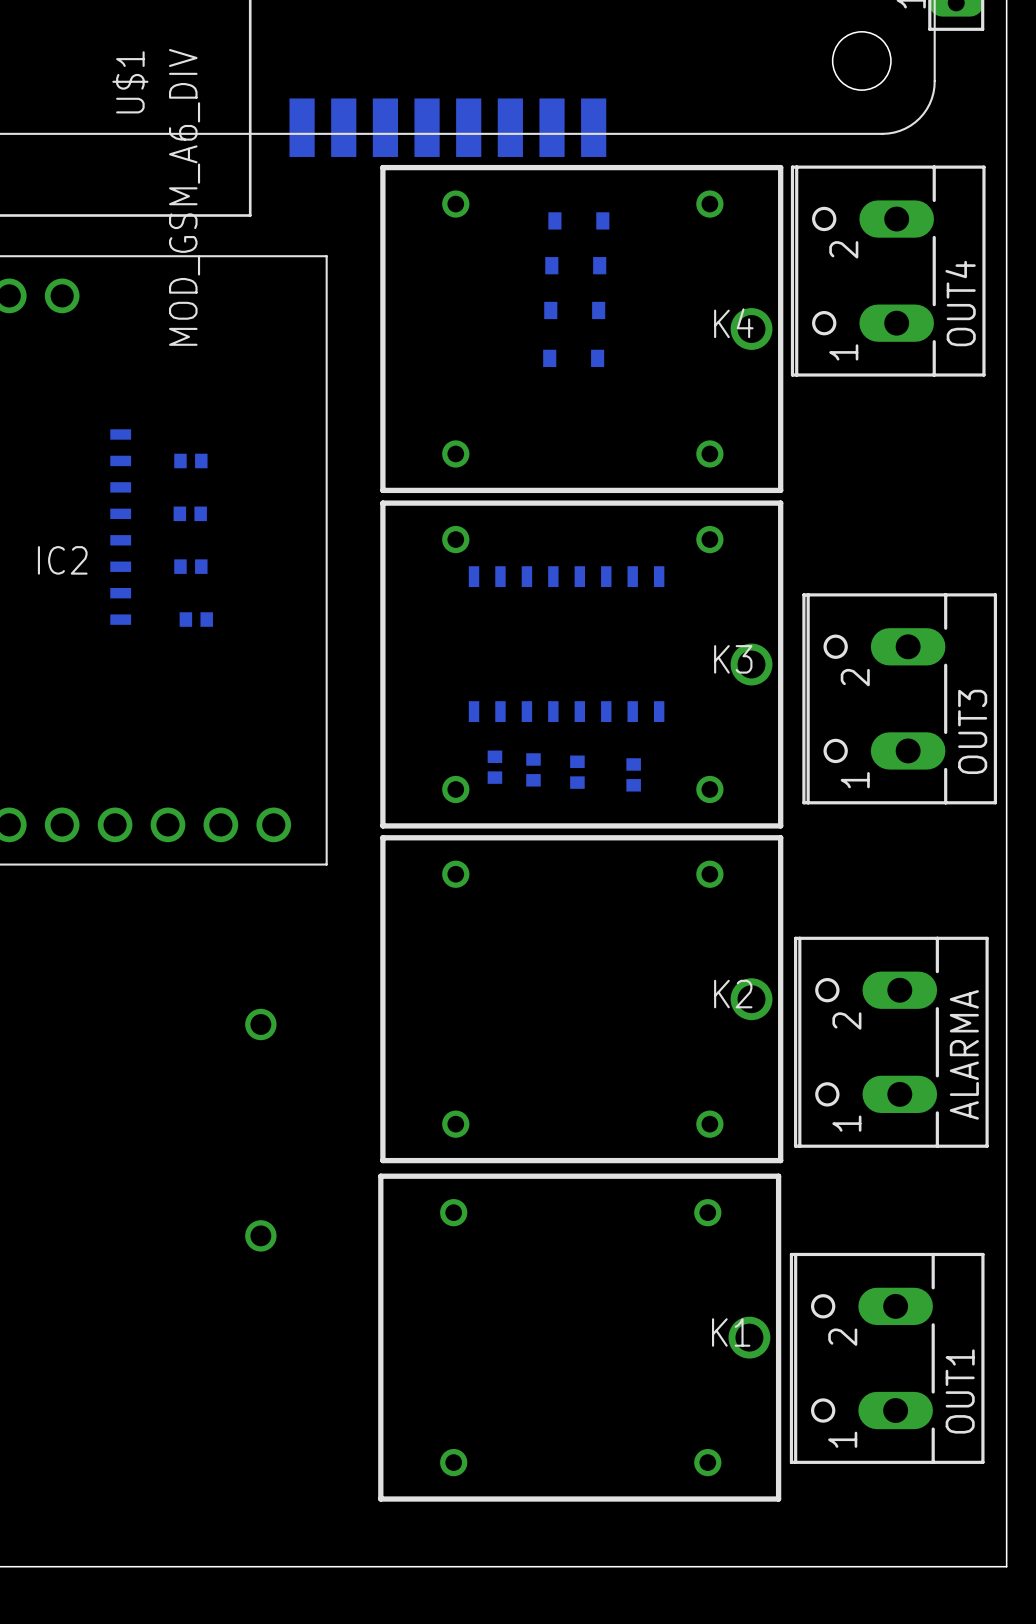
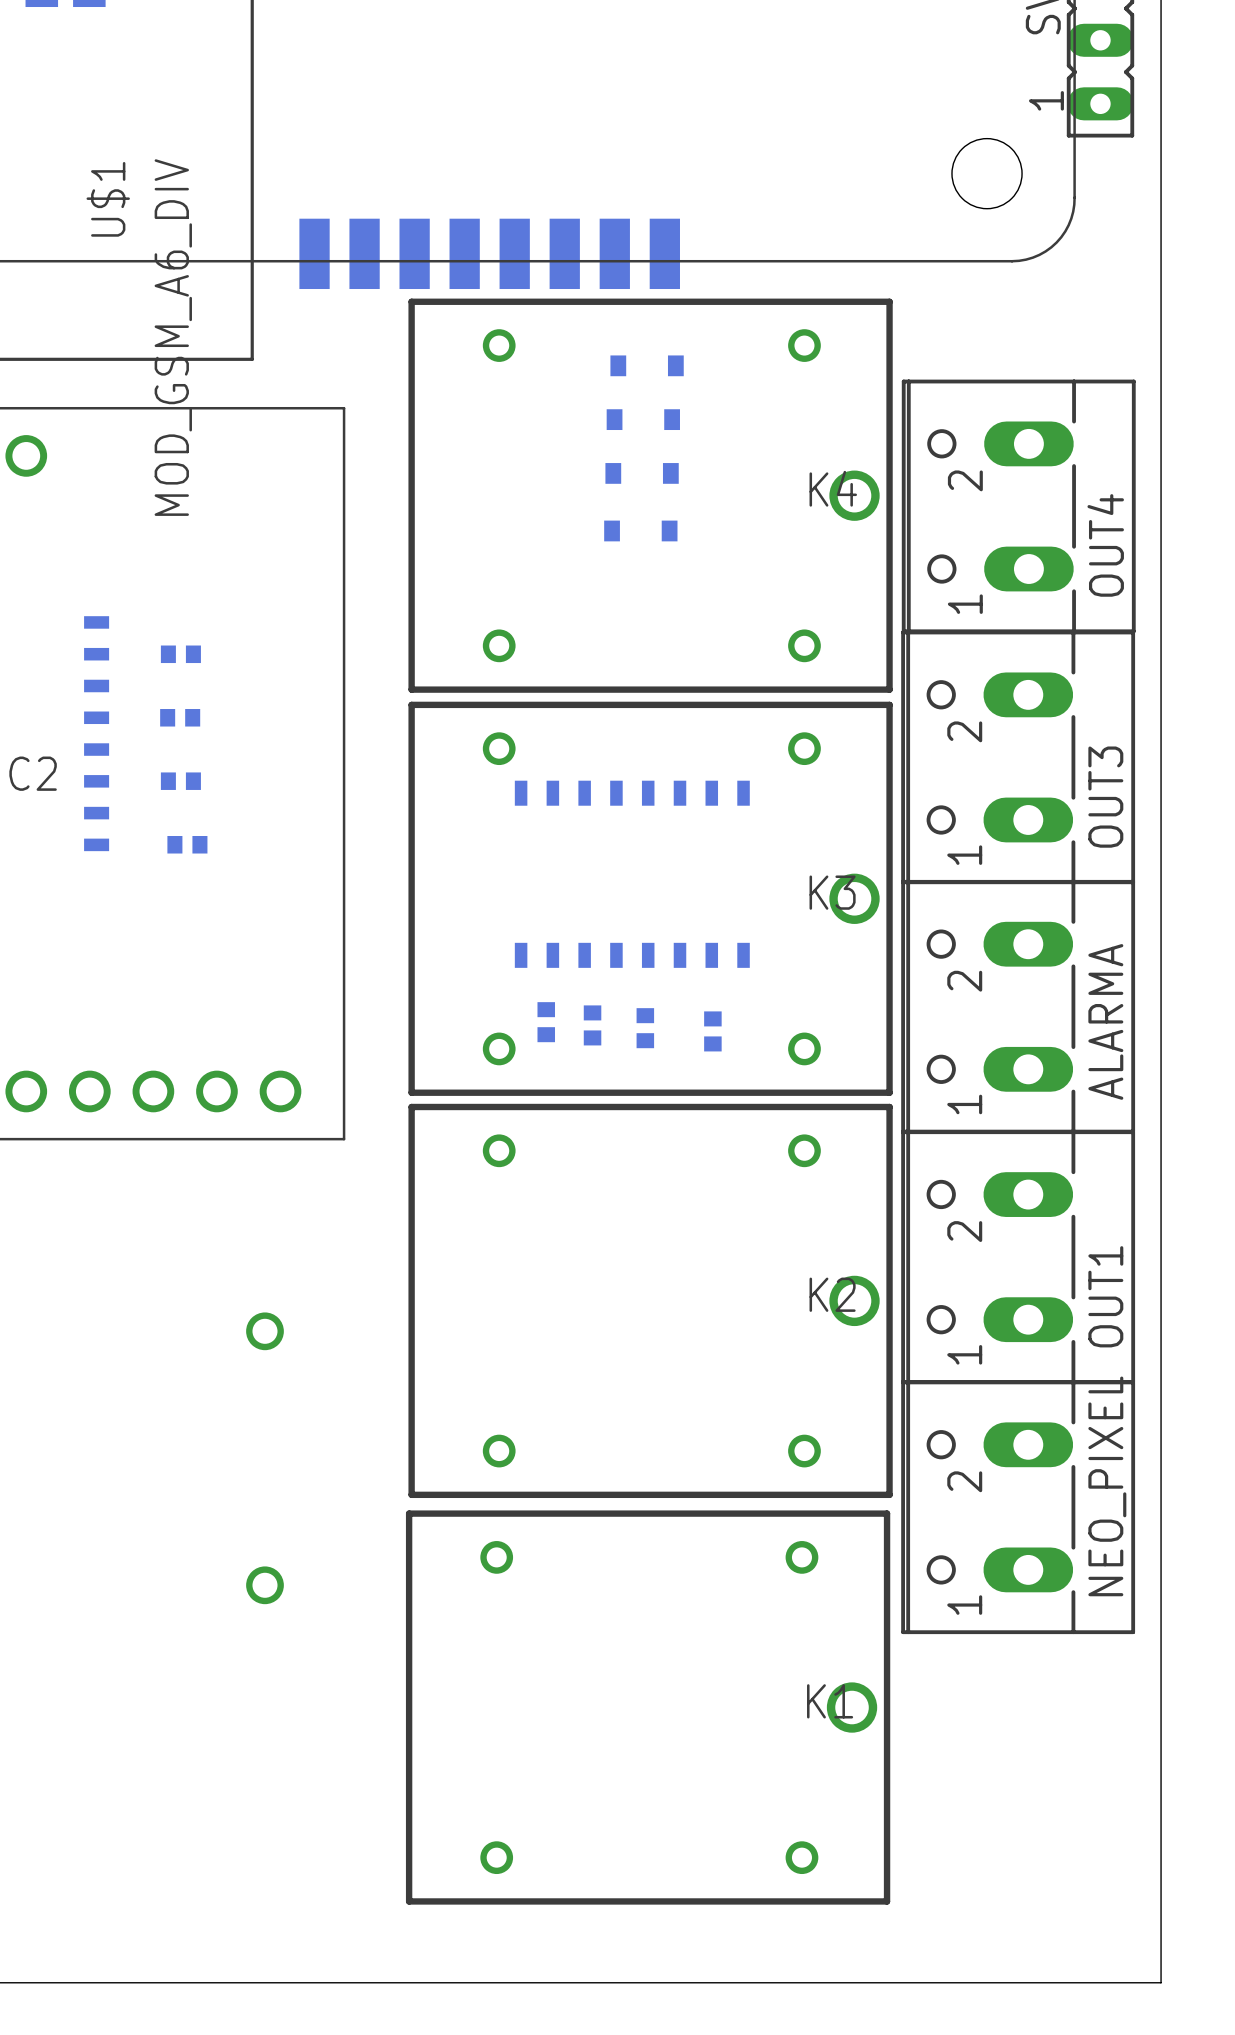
OUT4 position: (888, 271) -> (1018, 506)
OUT3 position: (899, 698) -> (1018, 757)
ALARMA position: (891, 1042) -> (1018, 1006)
NEO_PIXEL: none -> (1018, 1507)
OUT1 position: (887, 1358) -> (1018, 1257)

